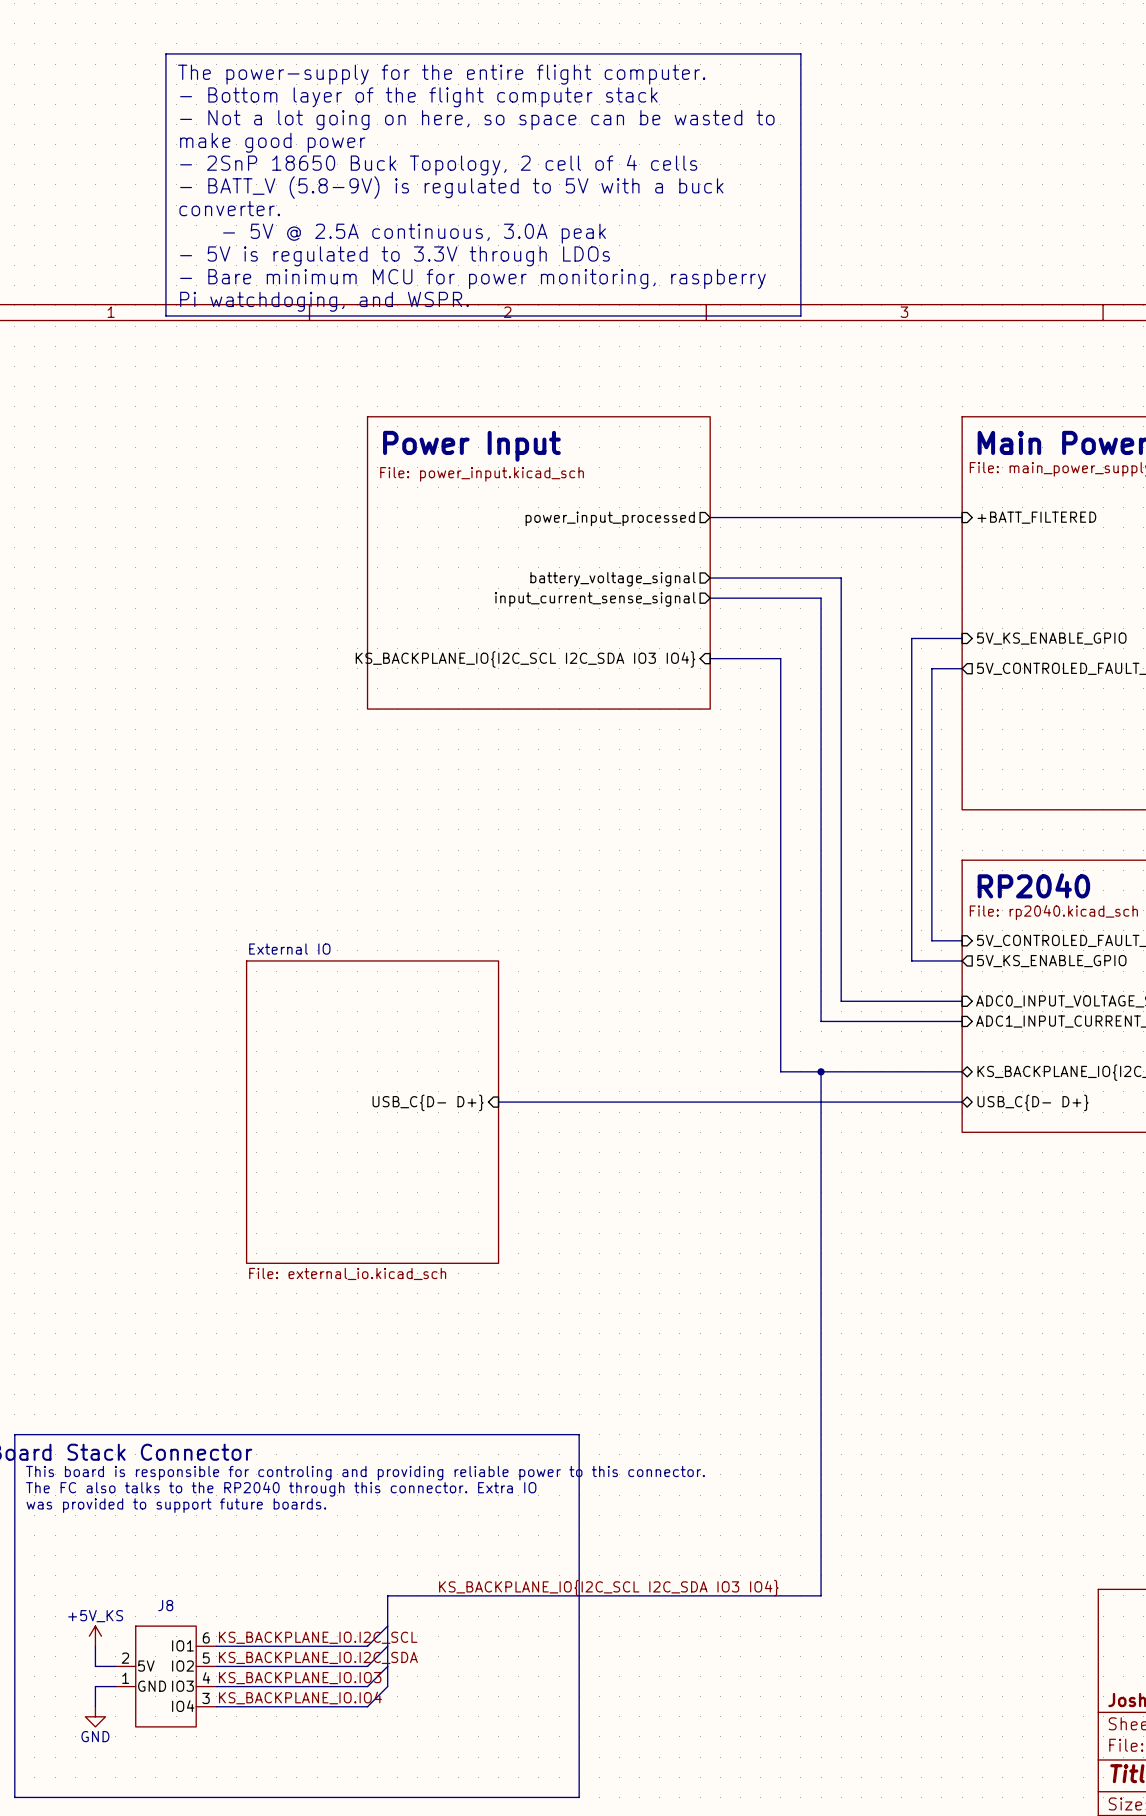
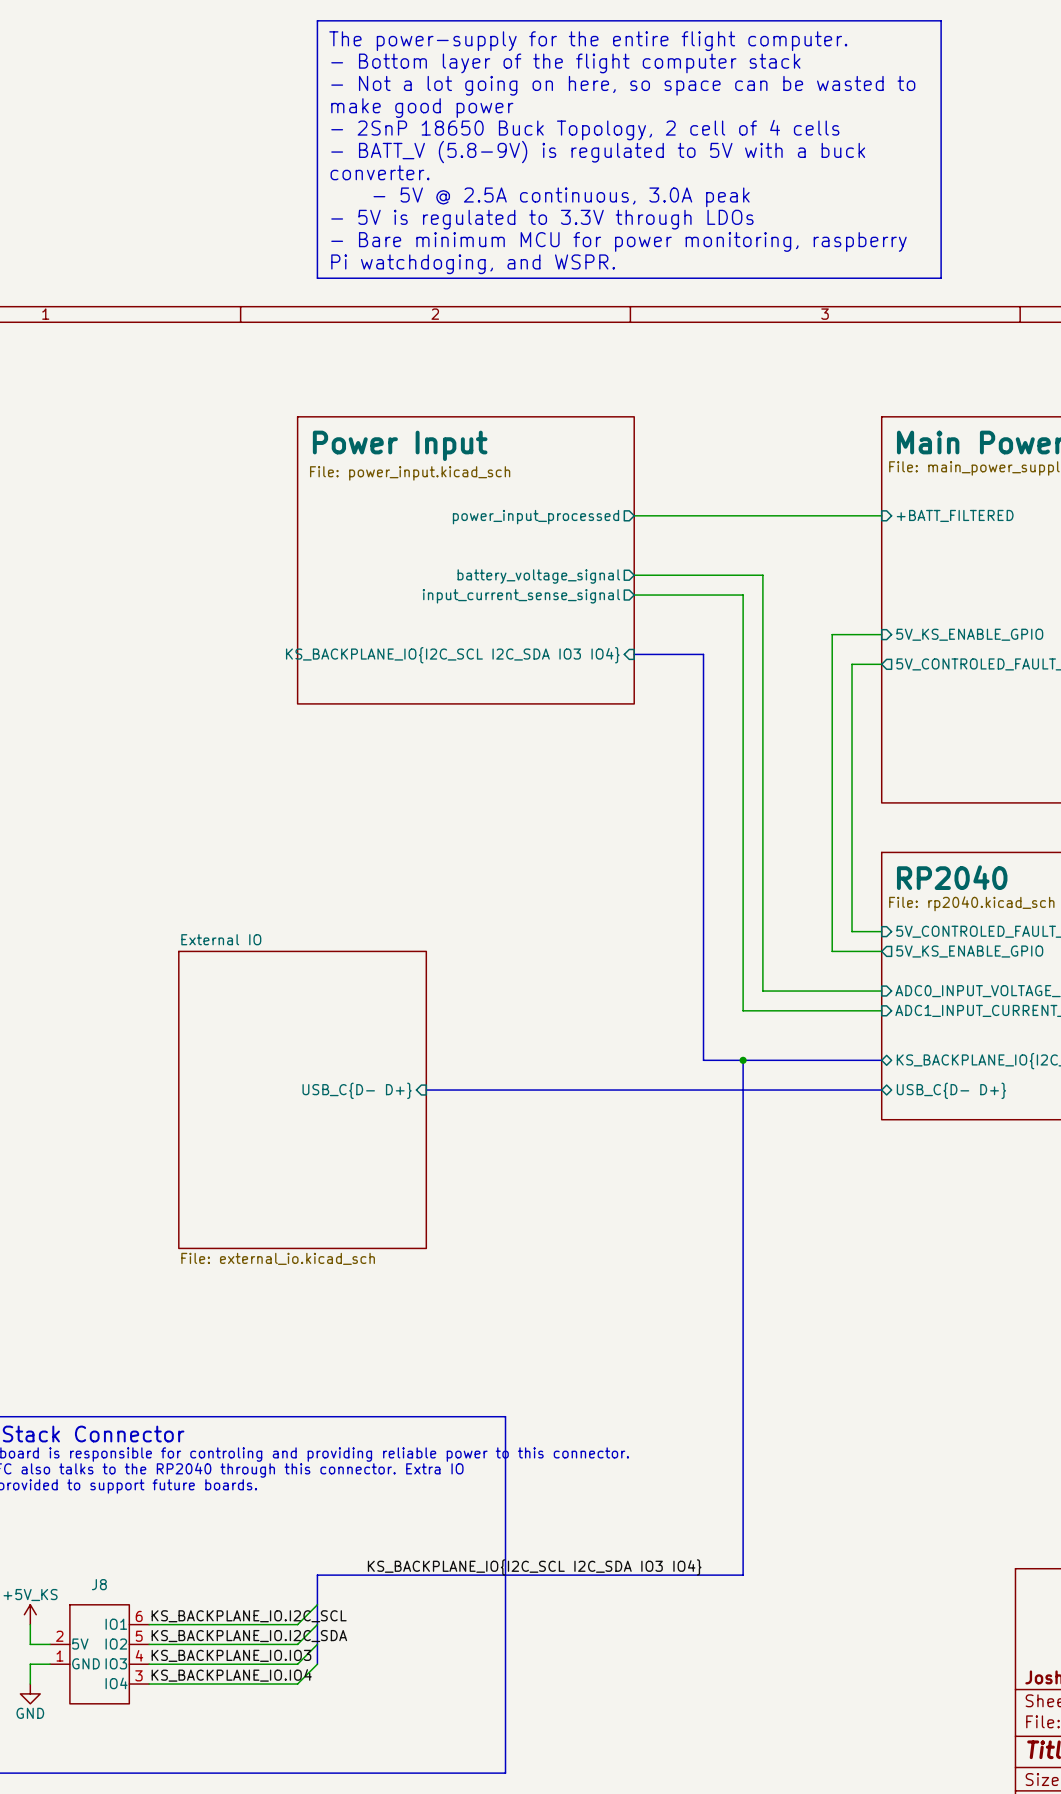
line: none -> (317, 20) (941, 20) (941, 278) (317, 278) (317, 20)
text: none -> The power-supply for the entire flight computer. (588, 41)
line: (165, 53) (800, 53) (800, 315) (165, 315) (165, 53) -> none
text: none -> - Bottom layer of the flight computer stack (565, 63)
text: The power-supply for the entire flight computer. (441, 74) -> none
text: none -> - Not a lot going on here, so space can be wasted to (623, 85)
text: - Bottom layer of the flight computer stack (418, 97) -> none
text: none -> make good power (422, 108)
text: - Not a lot going on here, so space can be wasted to (477, 120) -> none
text: none -> - 2SnP 18650 Buck Topology, 2 cell of 4 cells (585, 130)
text: make good power (272, 142) -> none
text: none -> - BATT_V (5.8-9V) is regulated to 5V with a buck (598, 152)
text: - 2SnP 18650 Buck Topology, 2 cell of 4 cells (438, 165) -> none
text: none -> converter. (380, 172)
text: - BATT_V (5.8-9V) is regulated to 5V with a buck (451, 187) -> none
text: none -> - 5V @ 2.5A continuous, 3.0A peak (561, 197)
text: converter. (229, 208) -> none
text: none -> - 5V is regulated to 3.3V through LDOs (542, 219)
text: - 5V @ 2.5A continuous, 3.0A peak (414, 233) -> none
text: none -> - Bare minimum MCU for power monitoring, raspberry (618, 241)
text: - 5V is regulated to 3.3V through LDOs (395, 256) -> none
text: none -> Pi watchdoging, and WSPR. (473, 264)
text: - Bare minimum MCU for power monitoring, raspberry (472, 279) -> none
text: Pi watchdoging, and WSPR. (324, 301) -> none

